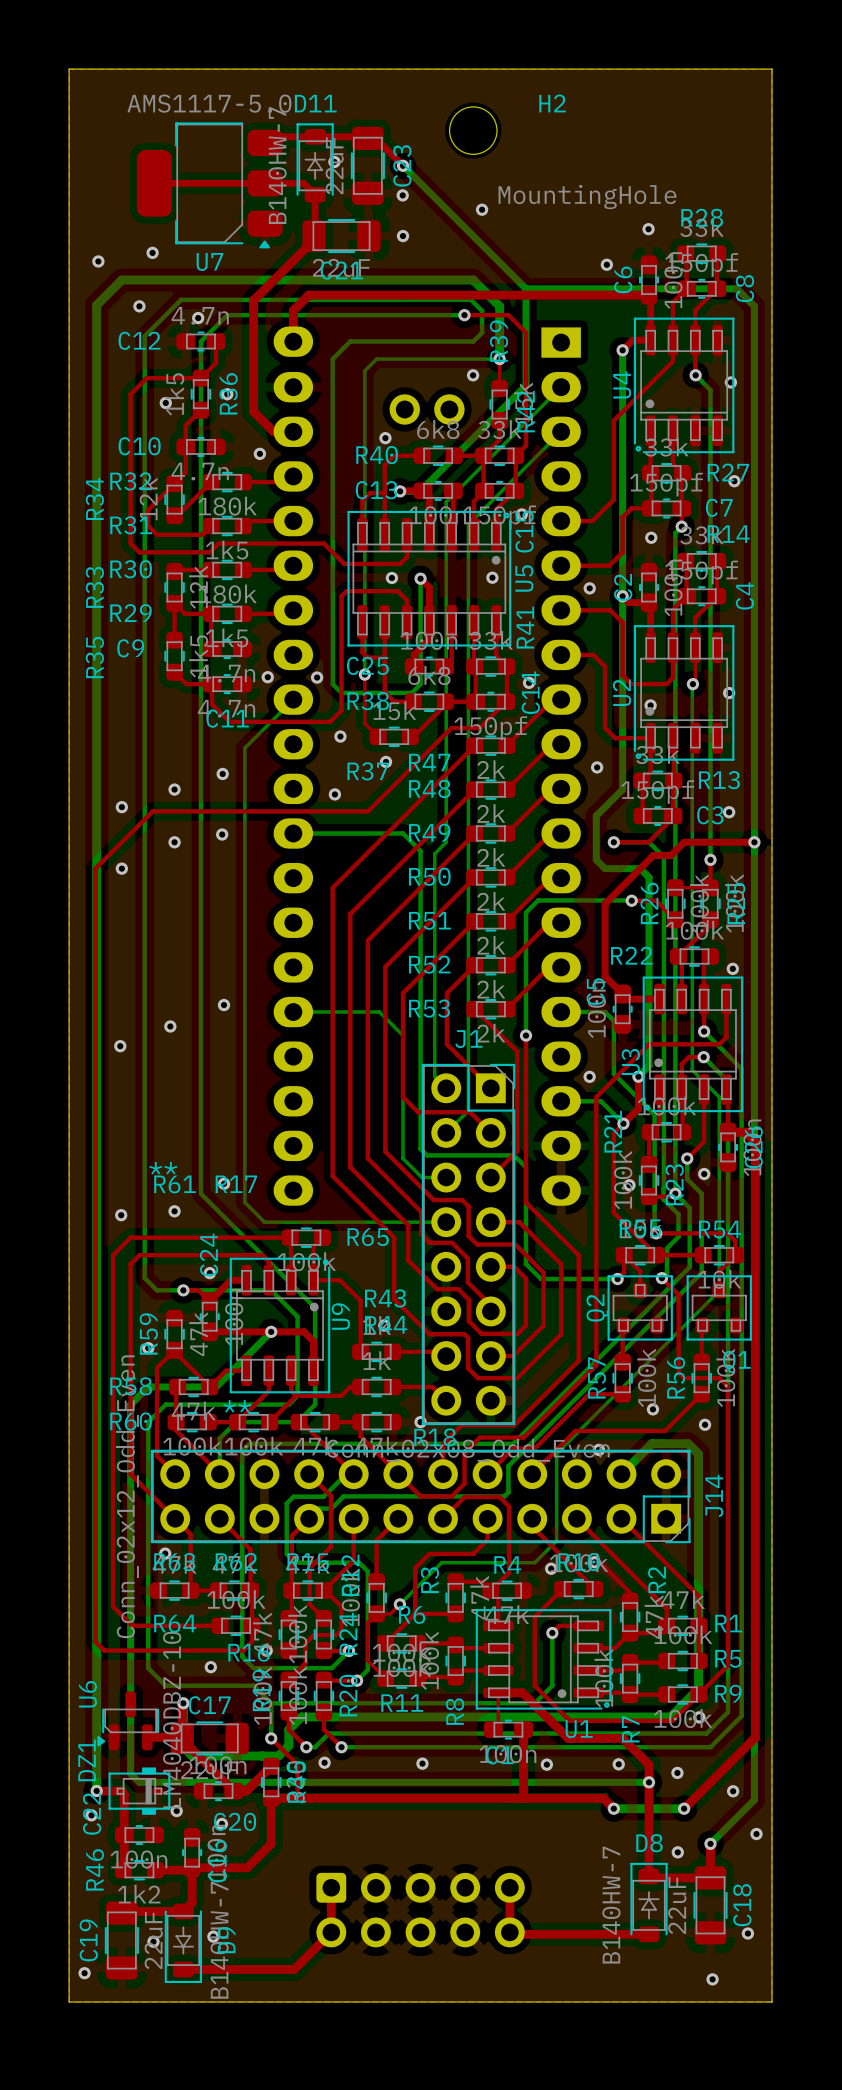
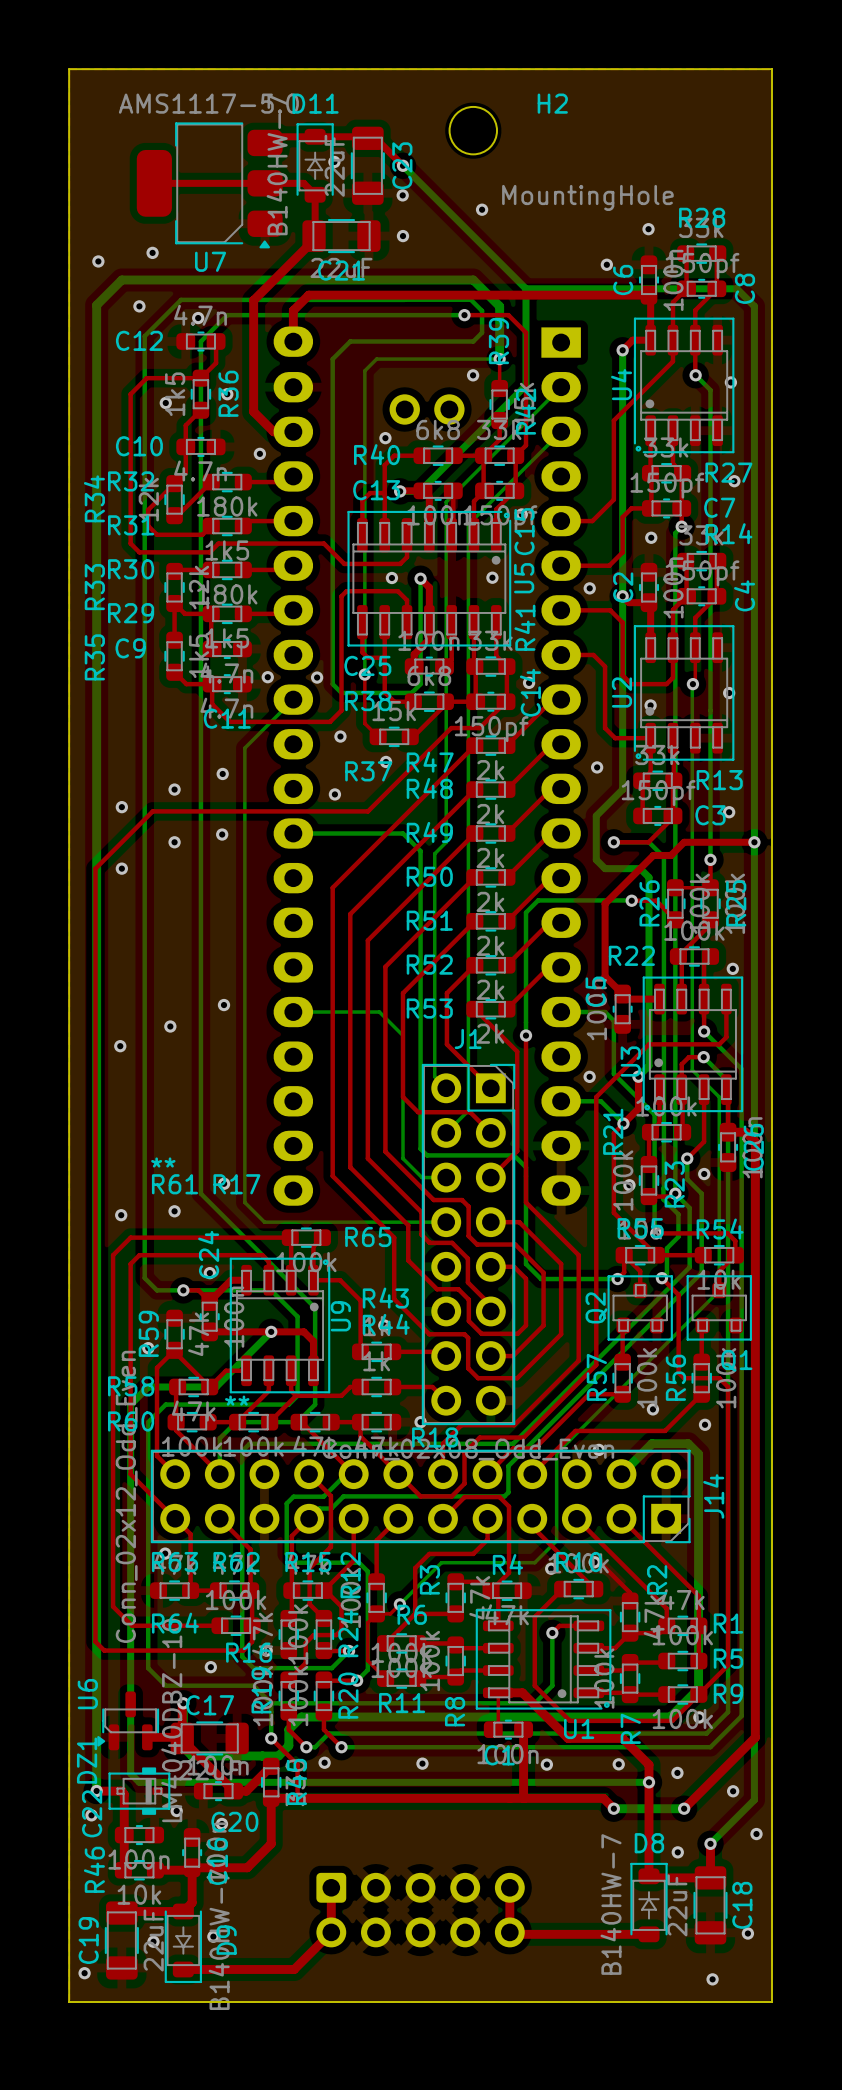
R46 value: 1k2 (139, 1894) -> 10k (139, 1894)

